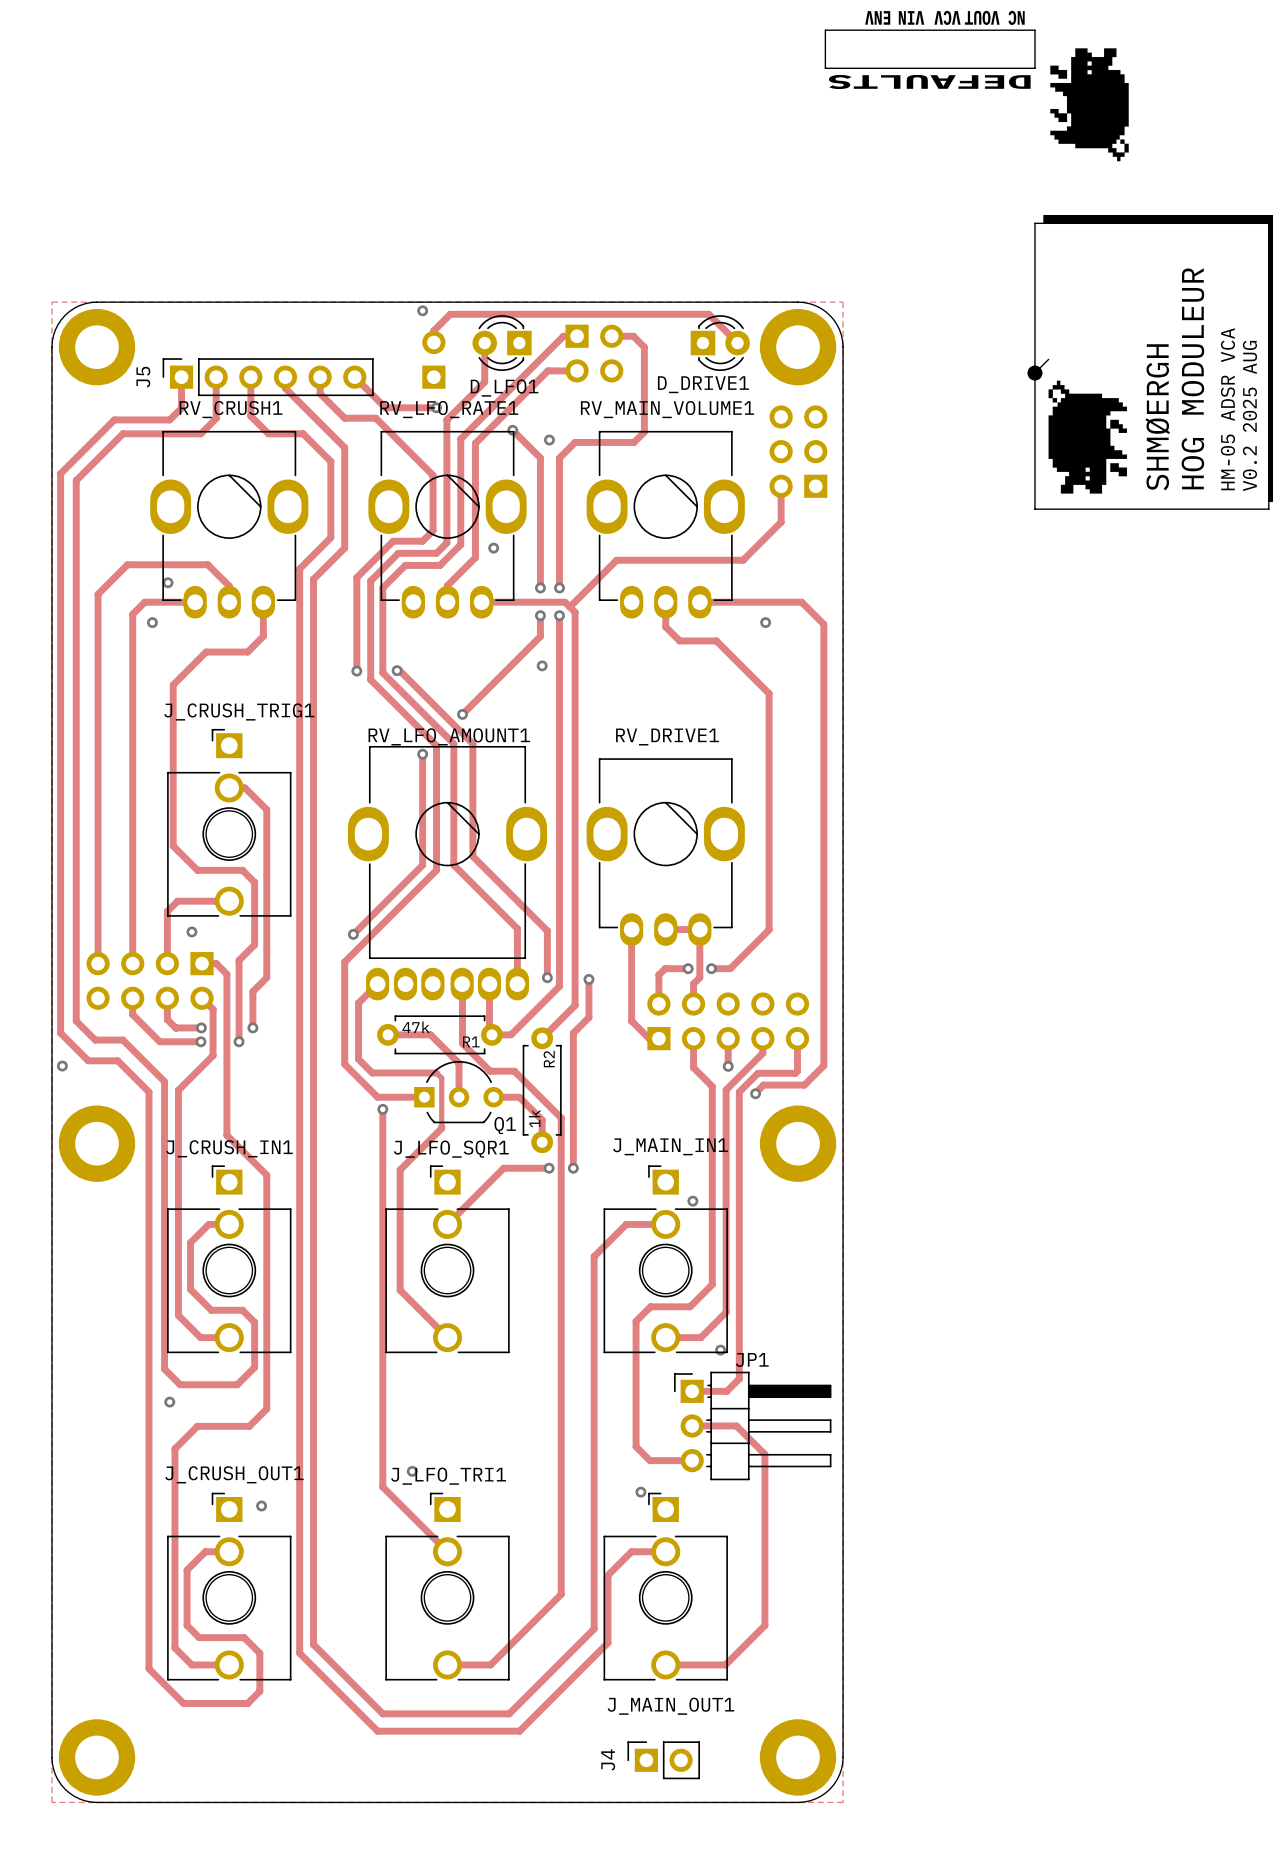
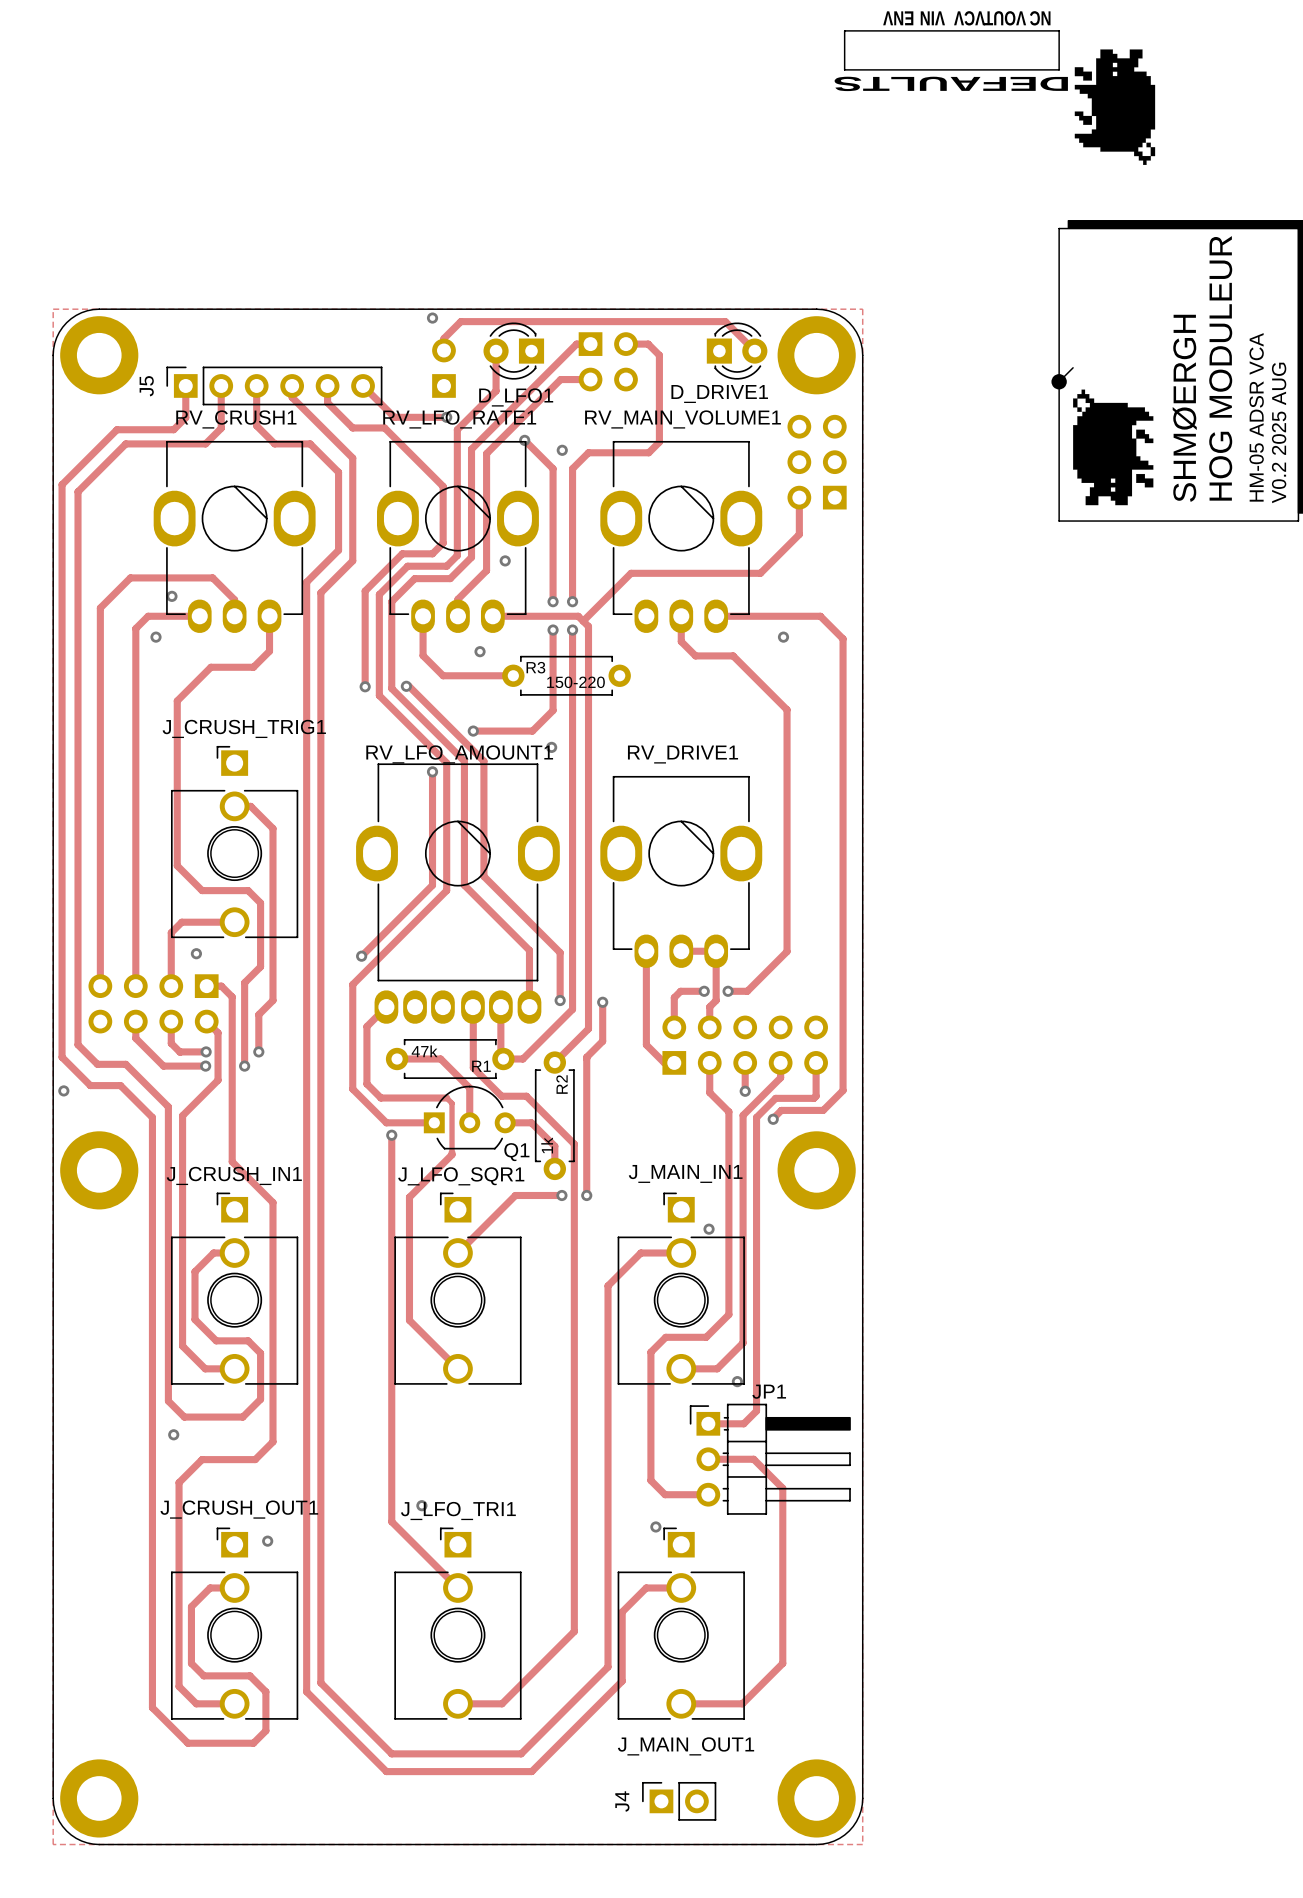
track: none -> (423, 616) (423, 655) (443, 675) (513, 675)
via: none -> (480, 651)
track: (540, 636) (462, 714) -> (553, 651) (553, 710) (532, 731) (473, 731)
R3: none -> 150-220 (566, 675)
via: (542, 665) -> none
via: none -> (551, 747)

